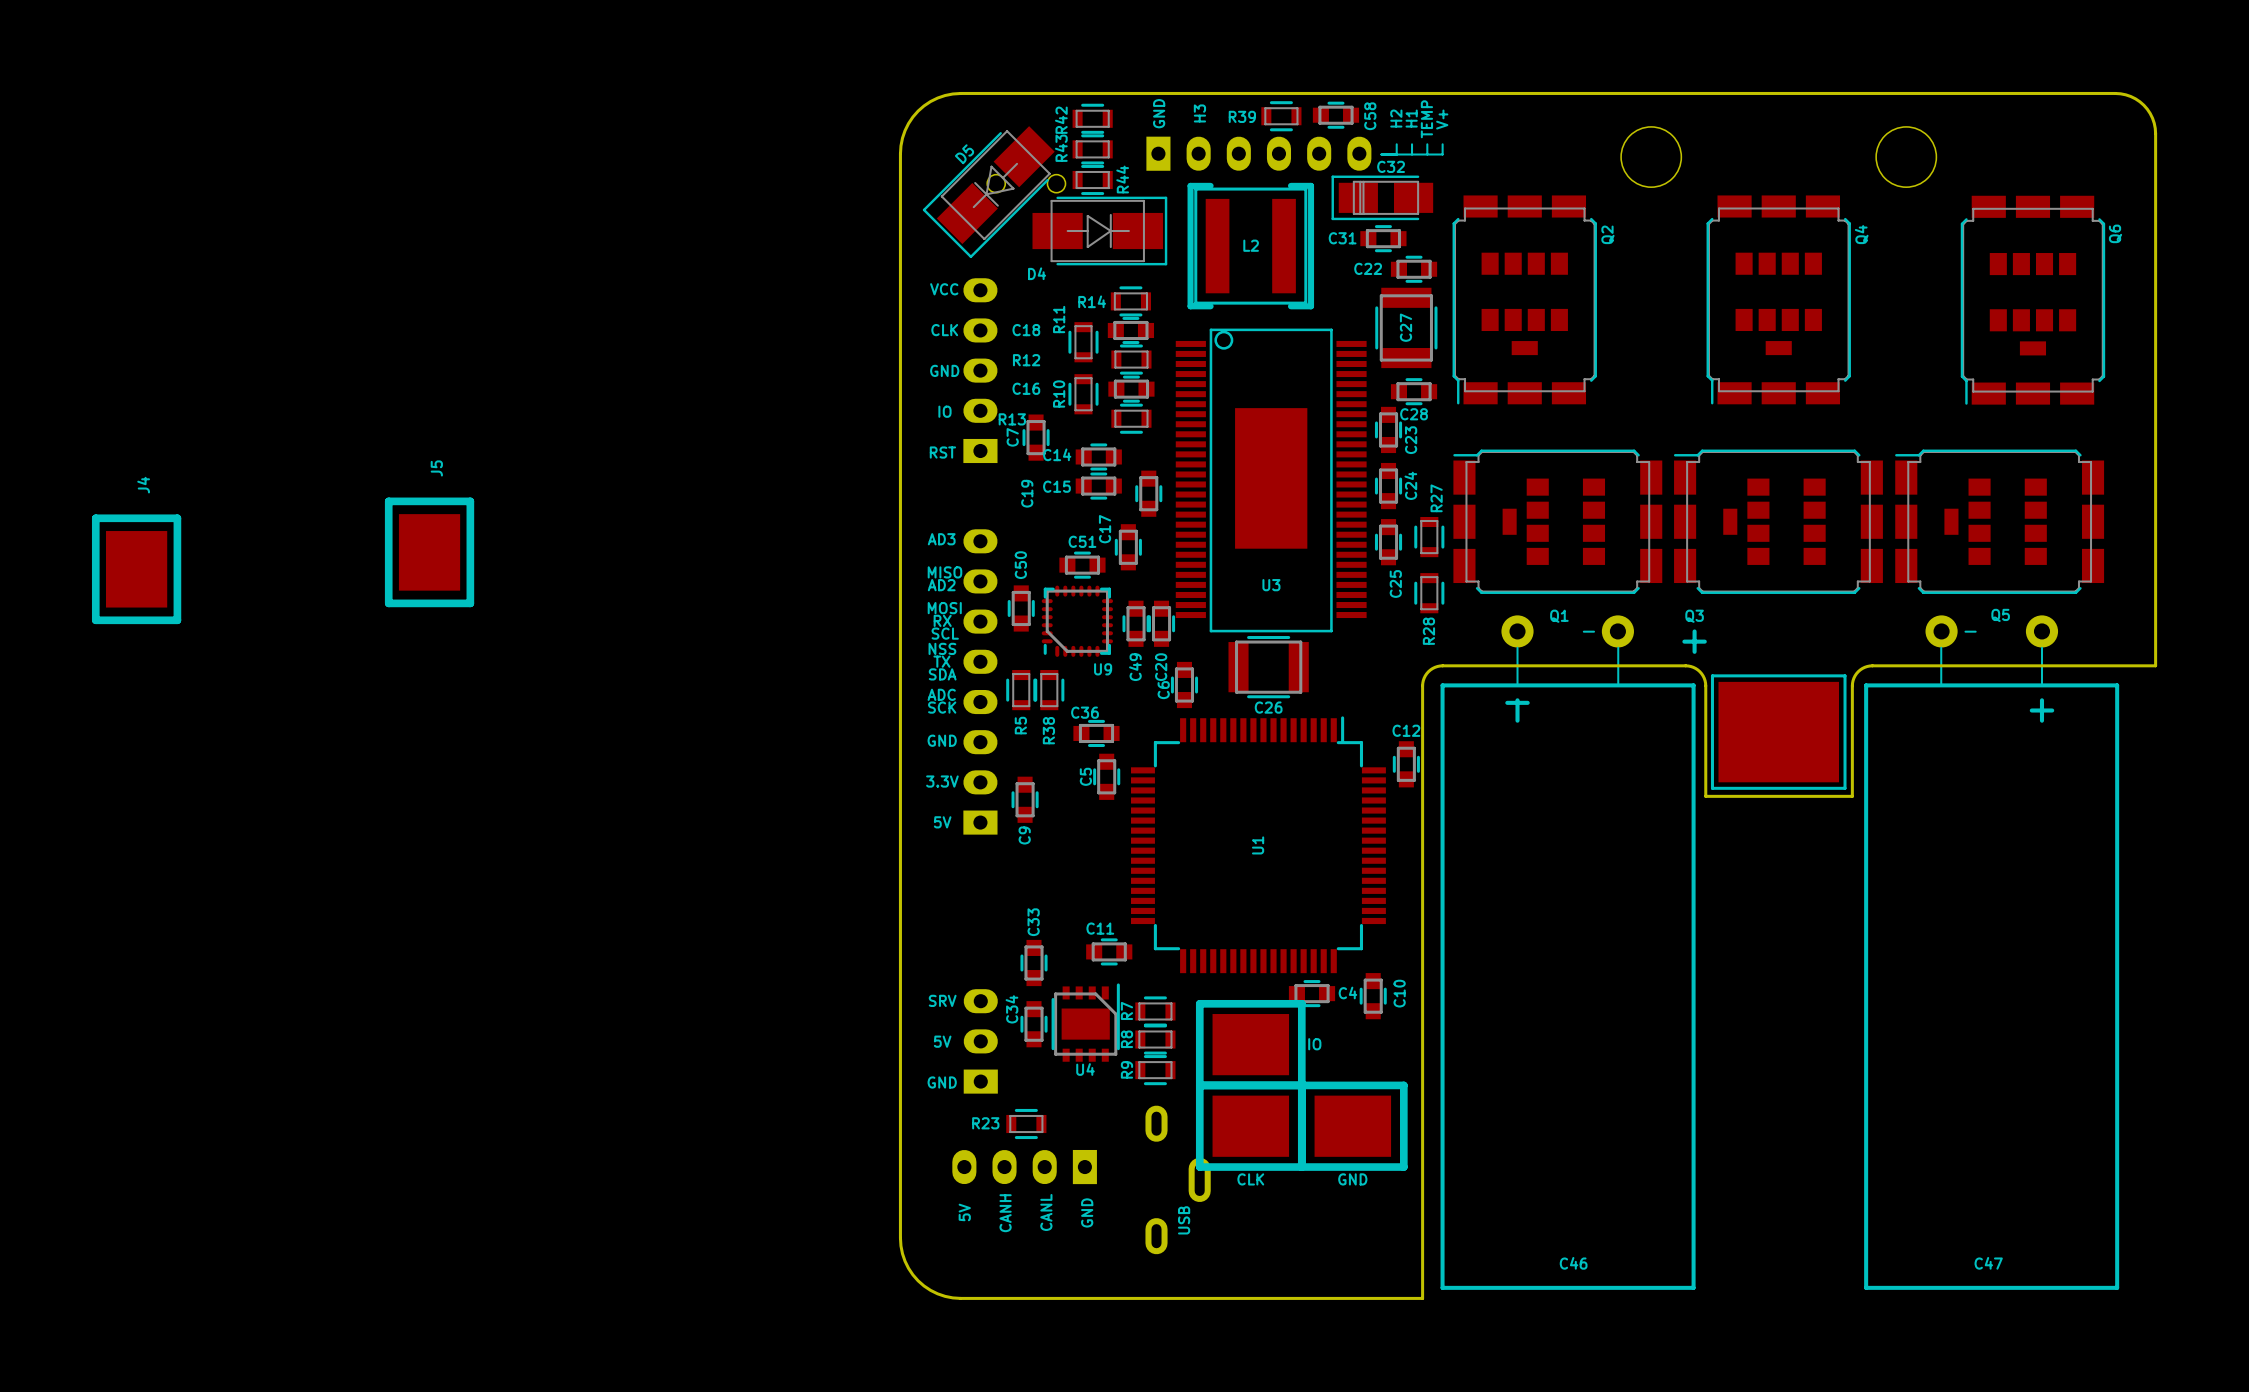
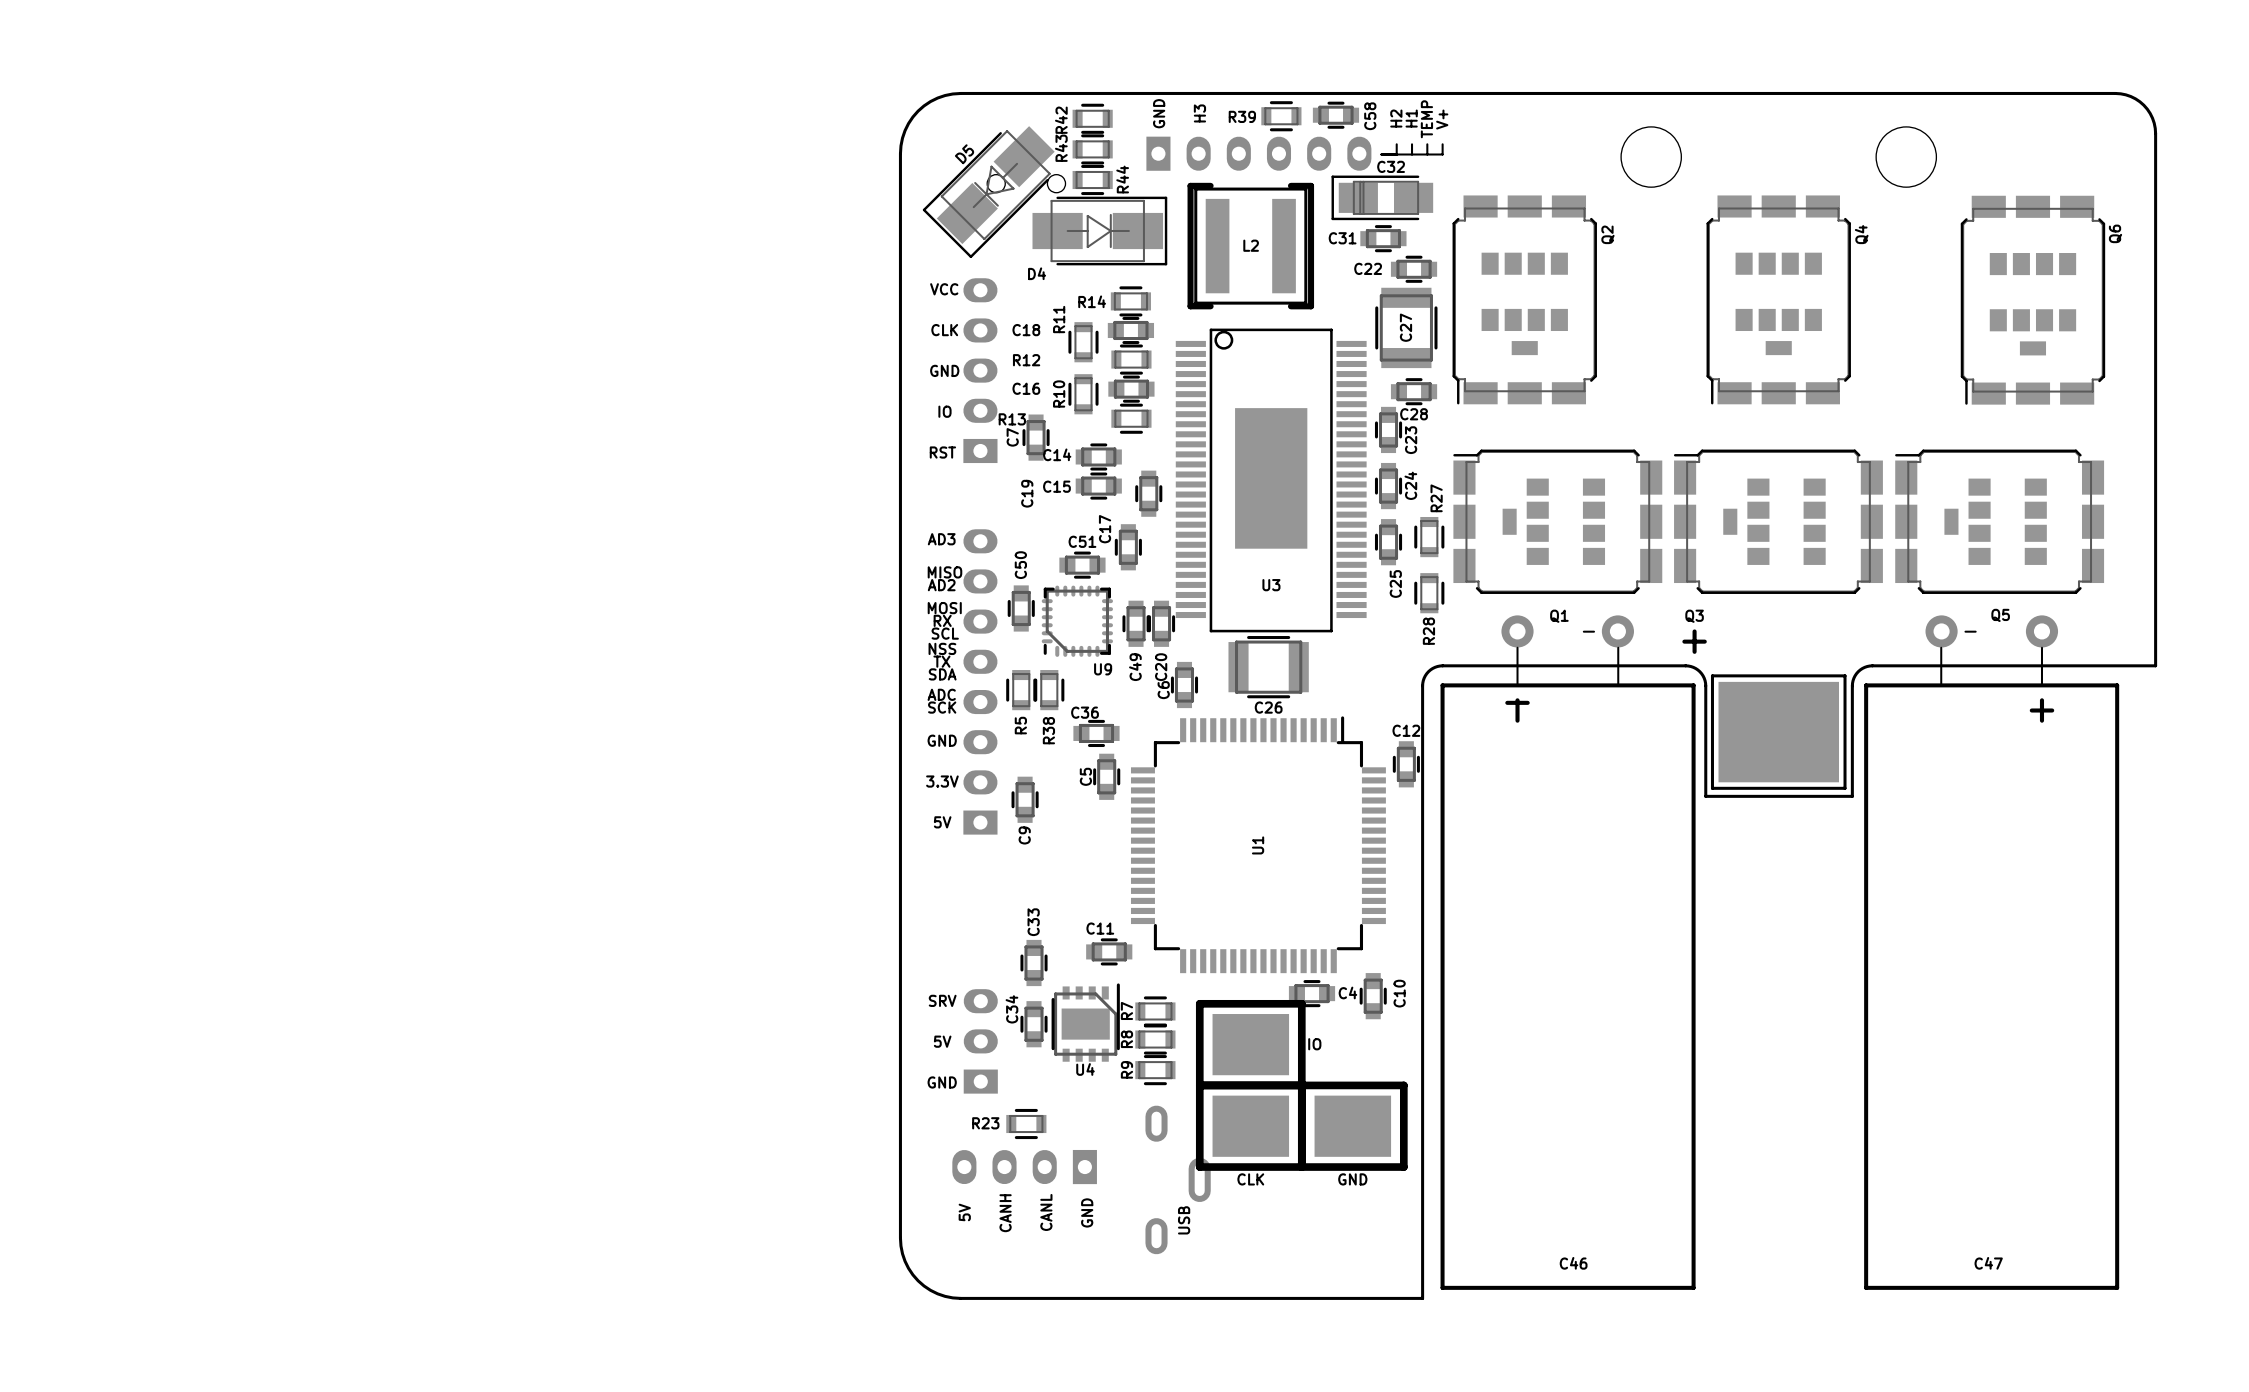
J5: (429, 552) -> none
J4: (136, 569) -> none

